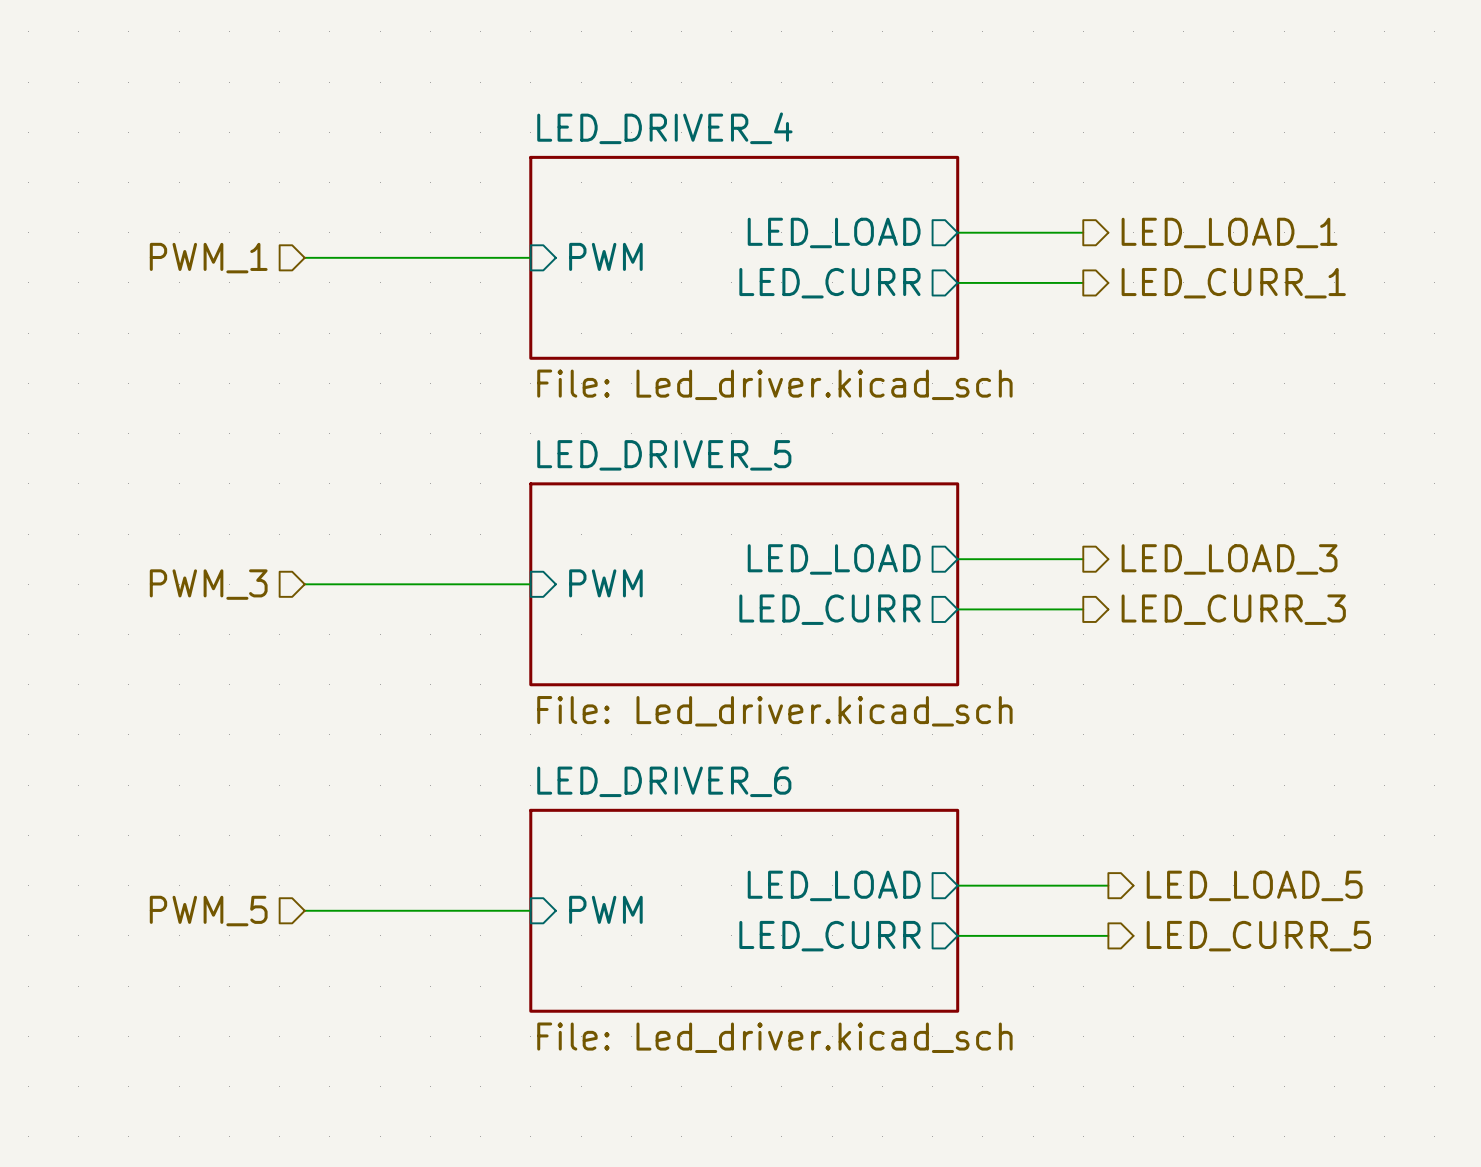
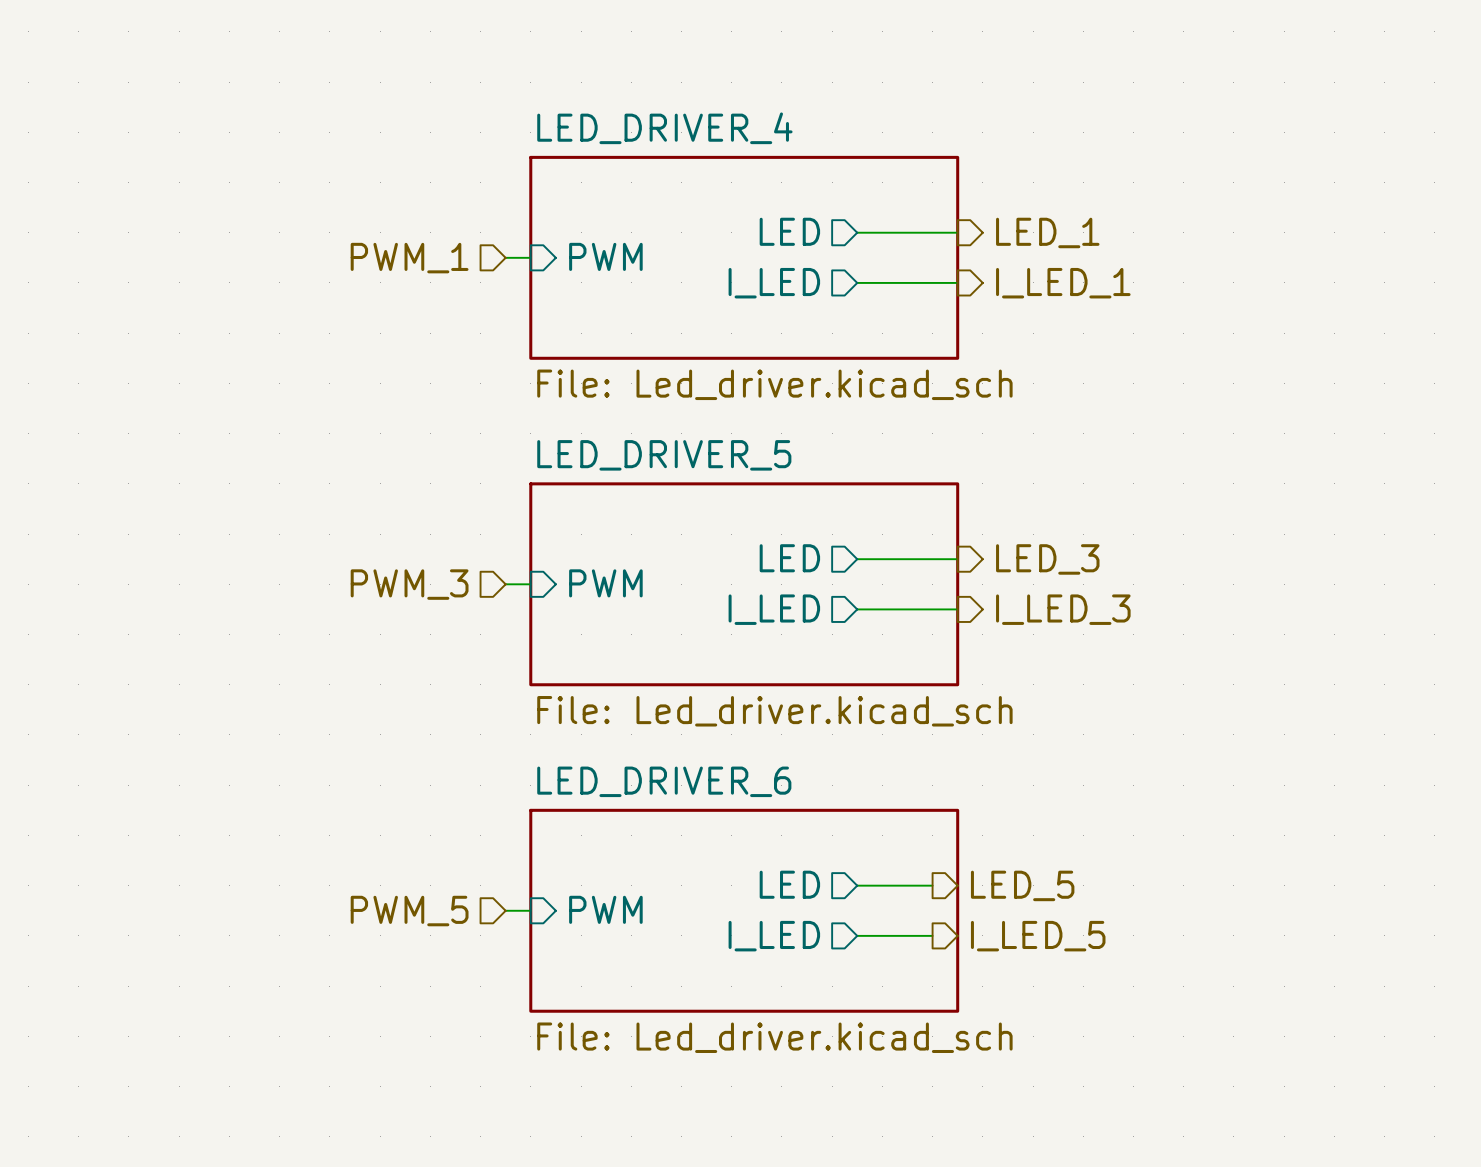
sheet pin: none -> LED (789, 231)
sheet pin: LED_LOAD (834, 232) -> none
wire: (957, 232) (1083, 232) -> (957, 232) (857, 232)
hierarchical label: none -> LED_1 (1047, 232)
hierarchical label: LED_LOAD_1 (1229, 232) -> none
wire: (304, 257) (505, 257) -> none
hierarchical label position: PWM_1 (208, 258) -> PWM_1 (409, 258)
wire: (957, 282) (1083, 282) -> (957, 282) (857, 282)
sheet pin: none -> I_LED (774, 283)
sheet pin: LED_CURR (829, 283) -> none
hierarchical label: none -> I_LED_1 (1063, 283)
hierarchical label: LED_CURR_1 (1233, 283) -> none
sheet pin: none -> LED (789, 558)
sheet pin: LED_LOAD (834, 559) -> none
wire: (957, 559) (1083, 559) -> (957, 559) (857, 559)
hierarchical label: none -> LED_3 (1047, 559)
hierarchical label: LED_LOAD_3 (1229, 559) -> none
hierarchical label position: PWM_3 (208, 584) -> PWM_3 (409, 584)
wire: (304, 584) (505, 584) -> none
sheet pin: none -> I_LED (774, 609)
sheet pin: LED_CURR (829, 609) -> none
wire: (957, 609) (1083, 609) -> (957, 609) (857, 609)
hierarchical label: none -> I_LED_3 (1063, 609)
hierarchical label: LED_CURR_3 (1233, 609) -> none
sheet pin: none -> LED (789, 884)
sheet pin: LED_LOAD (834, 885) -> none
wire: none -> (857, 885) (932, 885)
wire: (957, 885) (1108, 885) -> none
hierarchical label: none -> LED_5 (1022, 885)
hierarchical label: LED_LOAD_5 (1254, 885) -> none
wire: (304, 910) (505, 910) -> none
hierarchical label position: PWM_5 (208, 911) -> PWM_5 (409, 911)
wire: none -> (857, 935) (932, 935)
wire: (957, 935) (1108, 935) -> none
sheet pin: none -> I_LED (774, 936)
sheet pin: LED_CURR (829, 936) -> none
hierarchical label: none -> I_LED_5 (1038, 936)
hierarchical label: LED_CURR_5 (1258, 936) -> none

